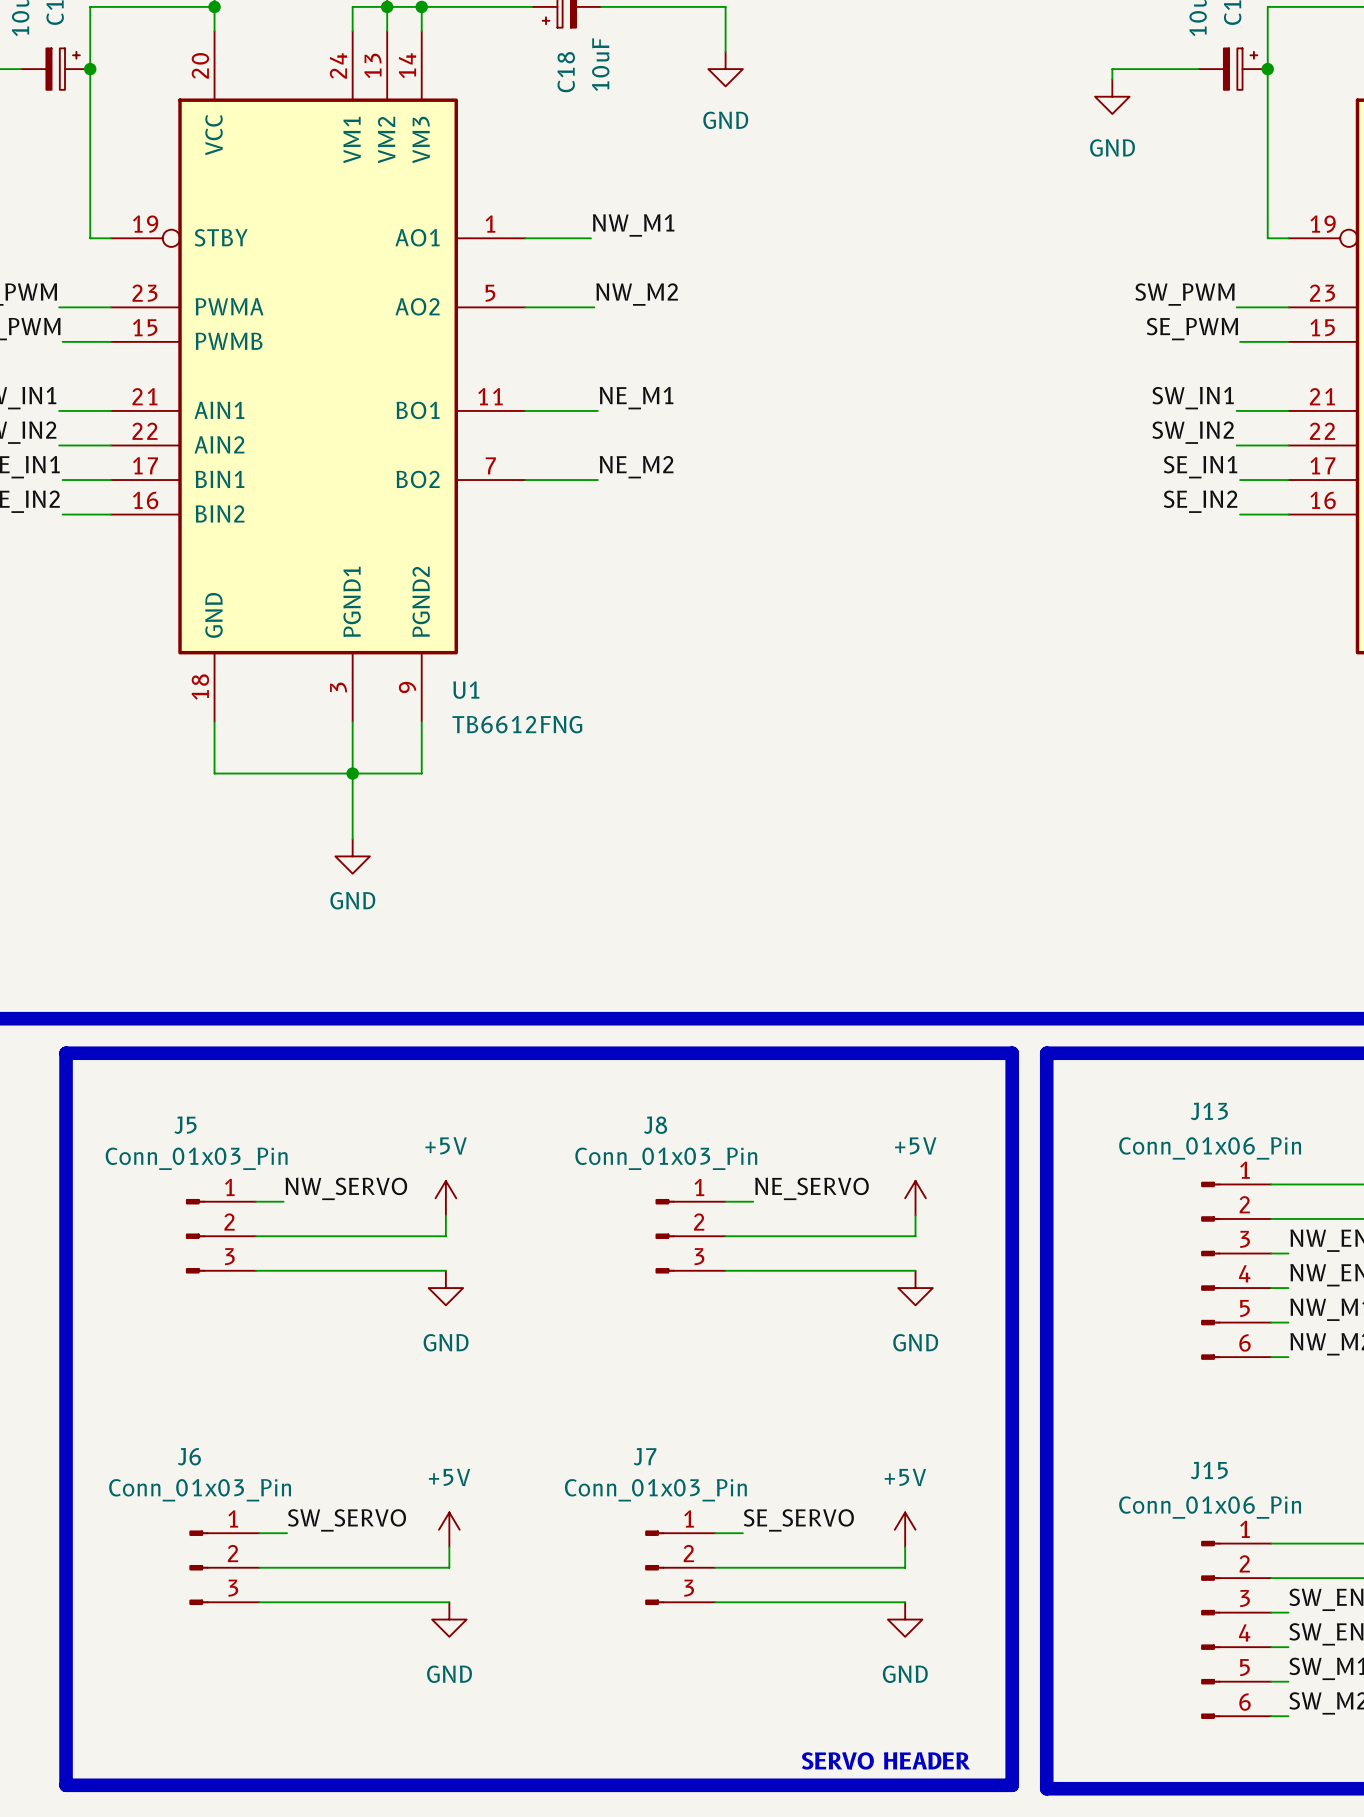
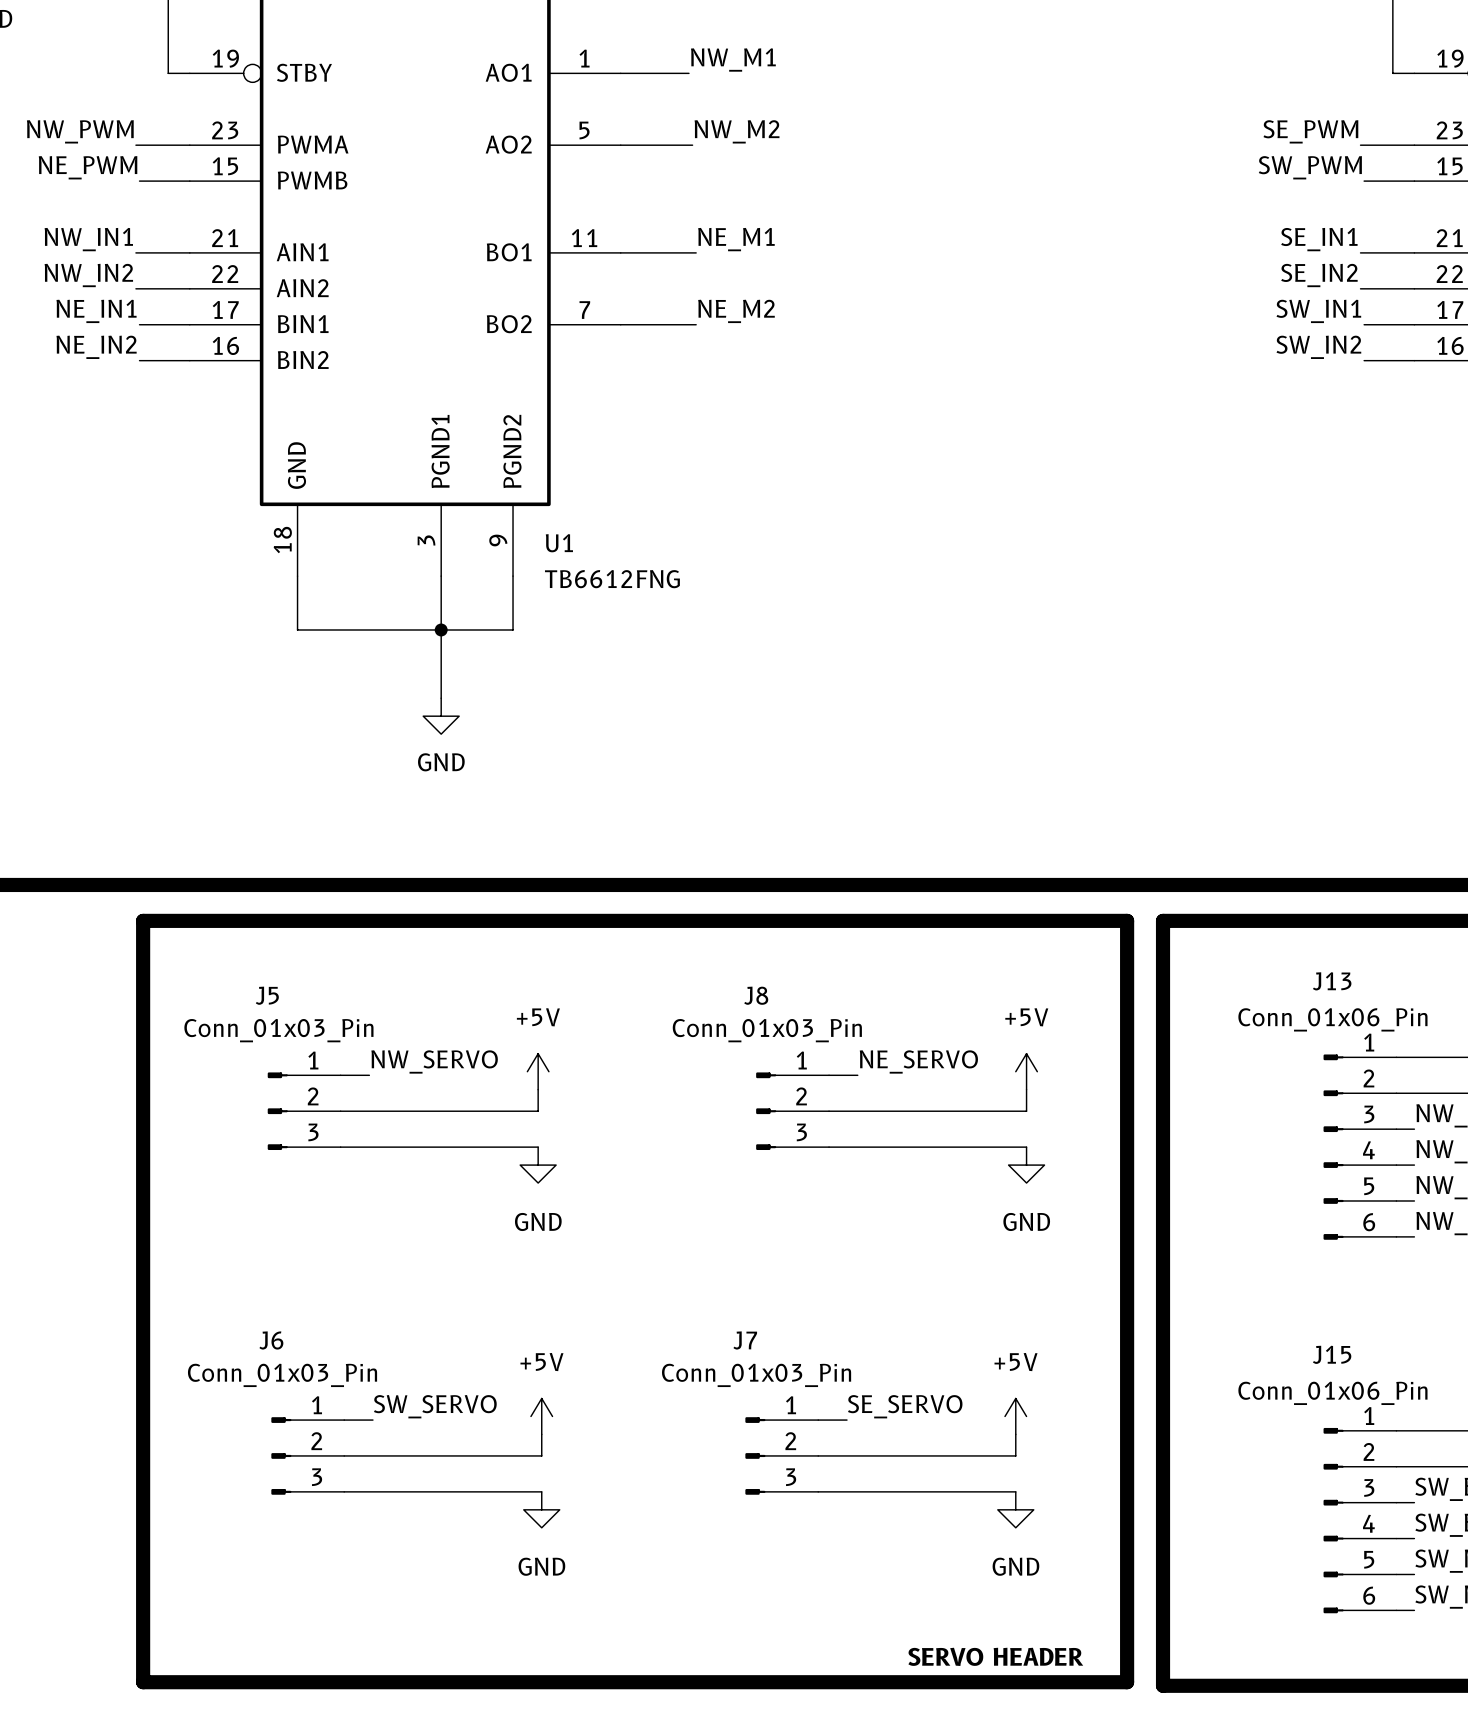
label: SW_PWM (1184, 294) -> SE_PWM (1310, 131)
label: SE_PWM (1192, 329) -> SW_PWM (1310, 167)
label: SW_IN1 (1193, 398) -> SE_IN1 (1319, 239)
label: SW_IN2 (1193, 432) -> SE_IN2 (1319, 275)
label: SE_IN1 (1200, 467) -> SW_IN1 (1318, 311)
label: SE_IN2 (1200, 501) -> SW_IN2 (1318, 347)

